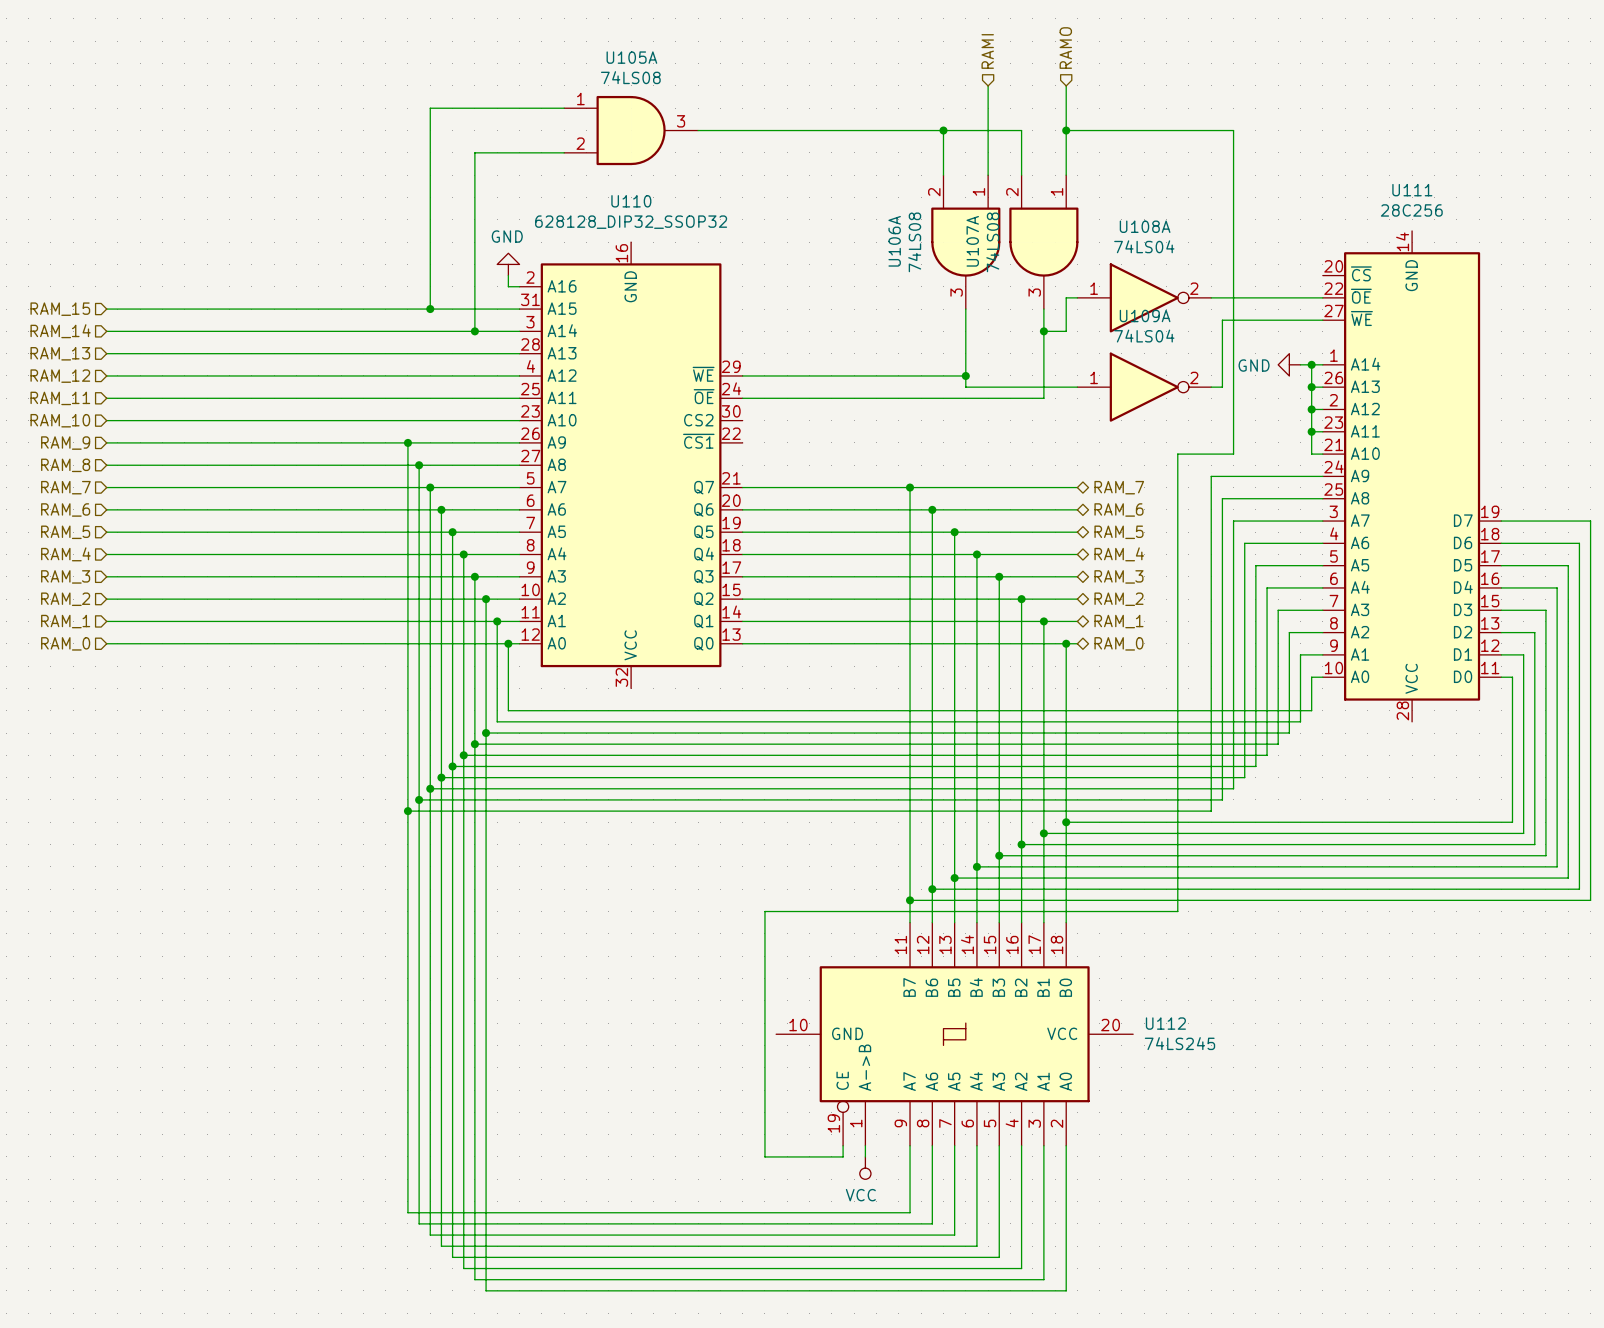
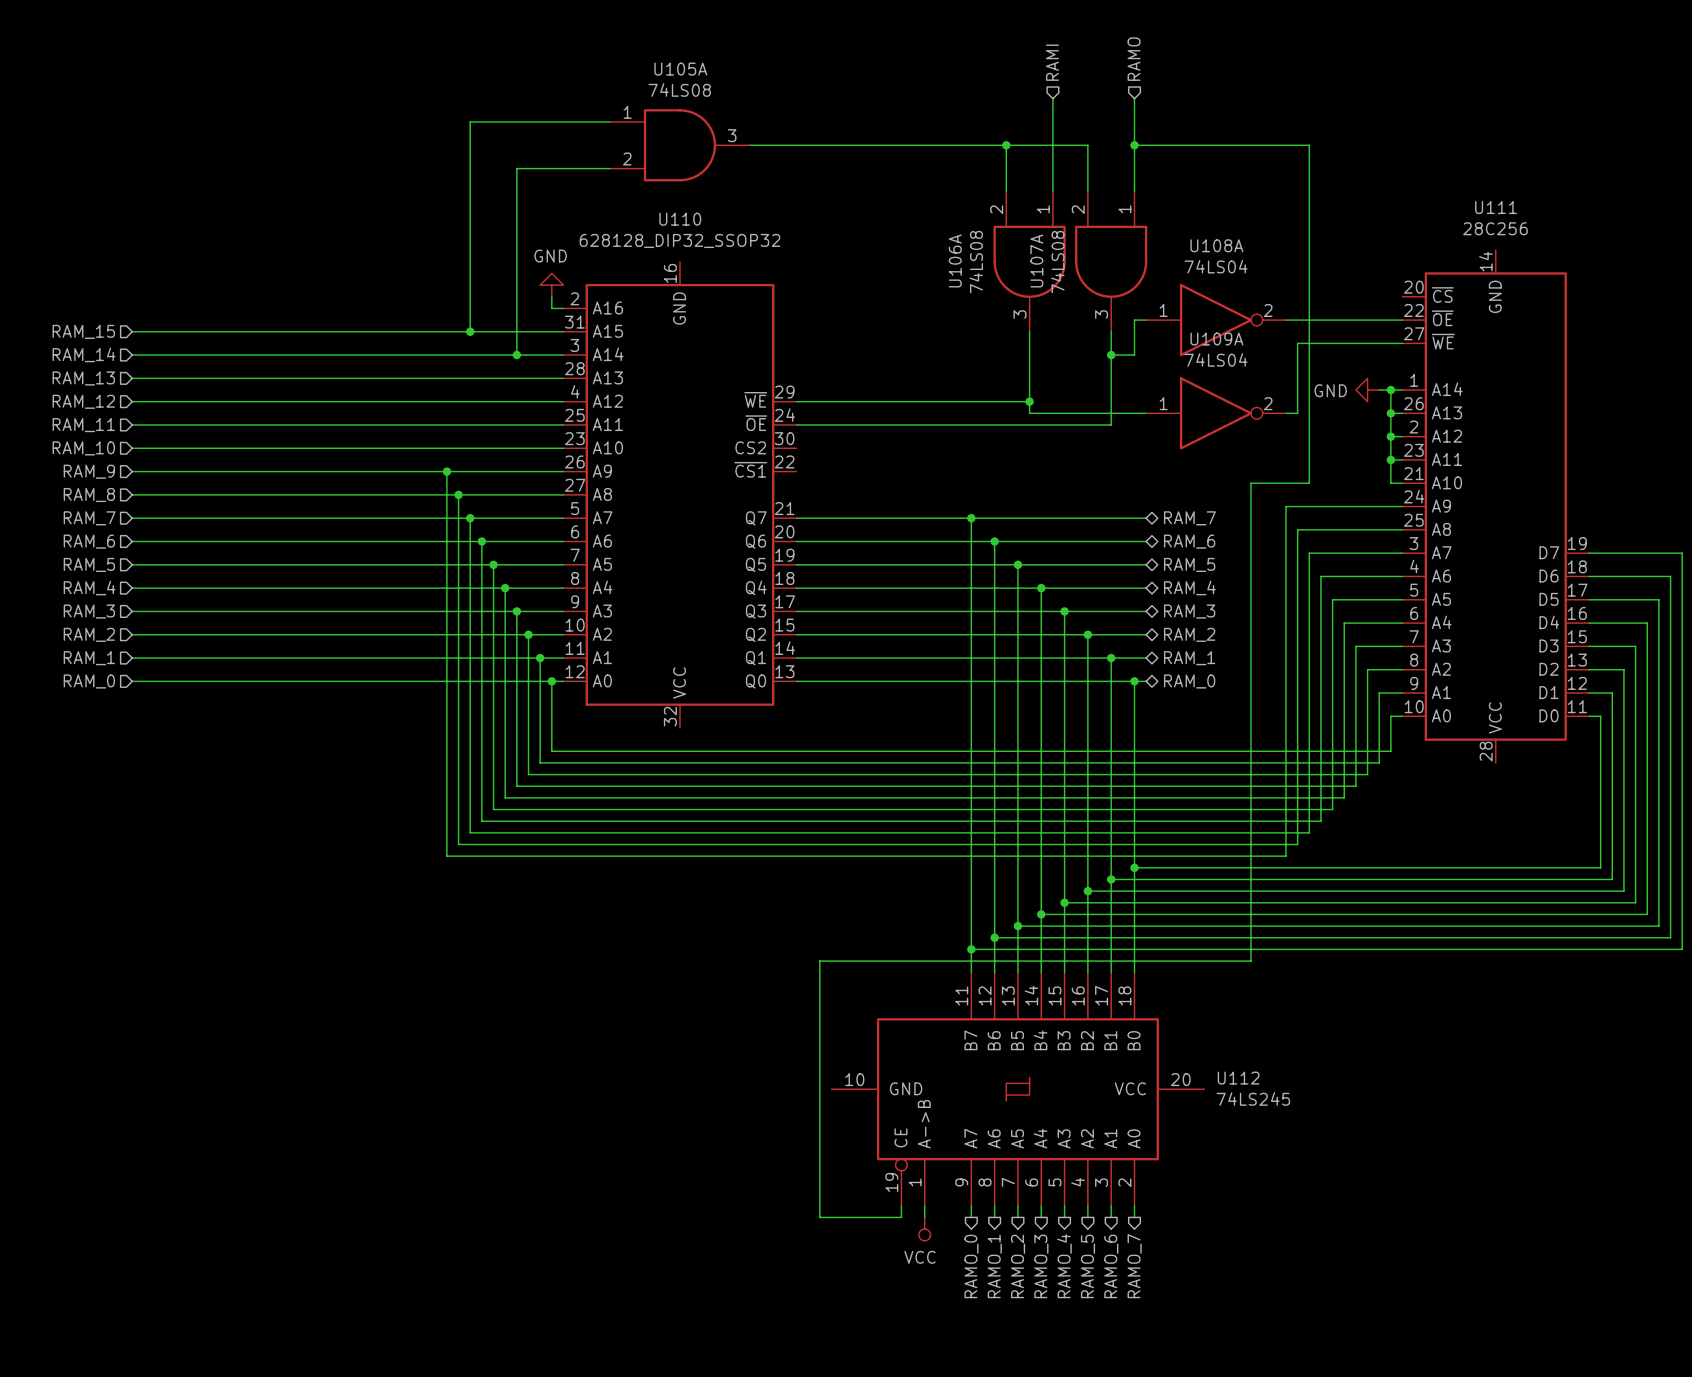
wire: (486, 733) (486, 1290) (1066, 1290) (1066, 1156) -> none
junction: (486, 733) -> none
wire: (474, 744) (474, 1279) (1043, 1279) (1043, 1156) -> none
junction: (474, 744) -> none
wire: (463, 755) (463, 1268) (1021, 1268) (1021, 1156) -> none
junction: (463, 755) -> none
wire: (452, 766) (452, 1257) (999, 1257) (999, 1156) -> none
junction: (452, 766) -> none
wire: (441, 777) (441, 1246) (976, 1246) (976, 1156) -> none
junction: (441, 777) -> none
wire: (430, 788) (430, 1235) (954, 1235) (954, 1156) -> none
junction: (430, 788) -> none
wire: (419, 799) (419, 1223) (932, 1223) (932, 1156) -> none
junction: (419, 799) -> none
wire: (407, 811) (407, 1212) (910, 1212) (910, 1156) -> none
junction: (407, 811) -> none
hierarchical label: none -> RAMO_0 (971, 1266)
hierarchical label: none -> RAMO_1 (994, 1266)
hierarchical label: none -> RAMO_2 (1018, 1266)
hierarchical label: none -> RAMO_3 (1041, 1266)
hierarchical label: none -> RAMO_4 (1064, 1266)
hierarchical label: none -> RAMO_5 (1088, 1266)
hierarchical label: none -> RAMO_6 (1111, 1266)
hierarchical label: none -> RAMO_7 (1134, 1266)

